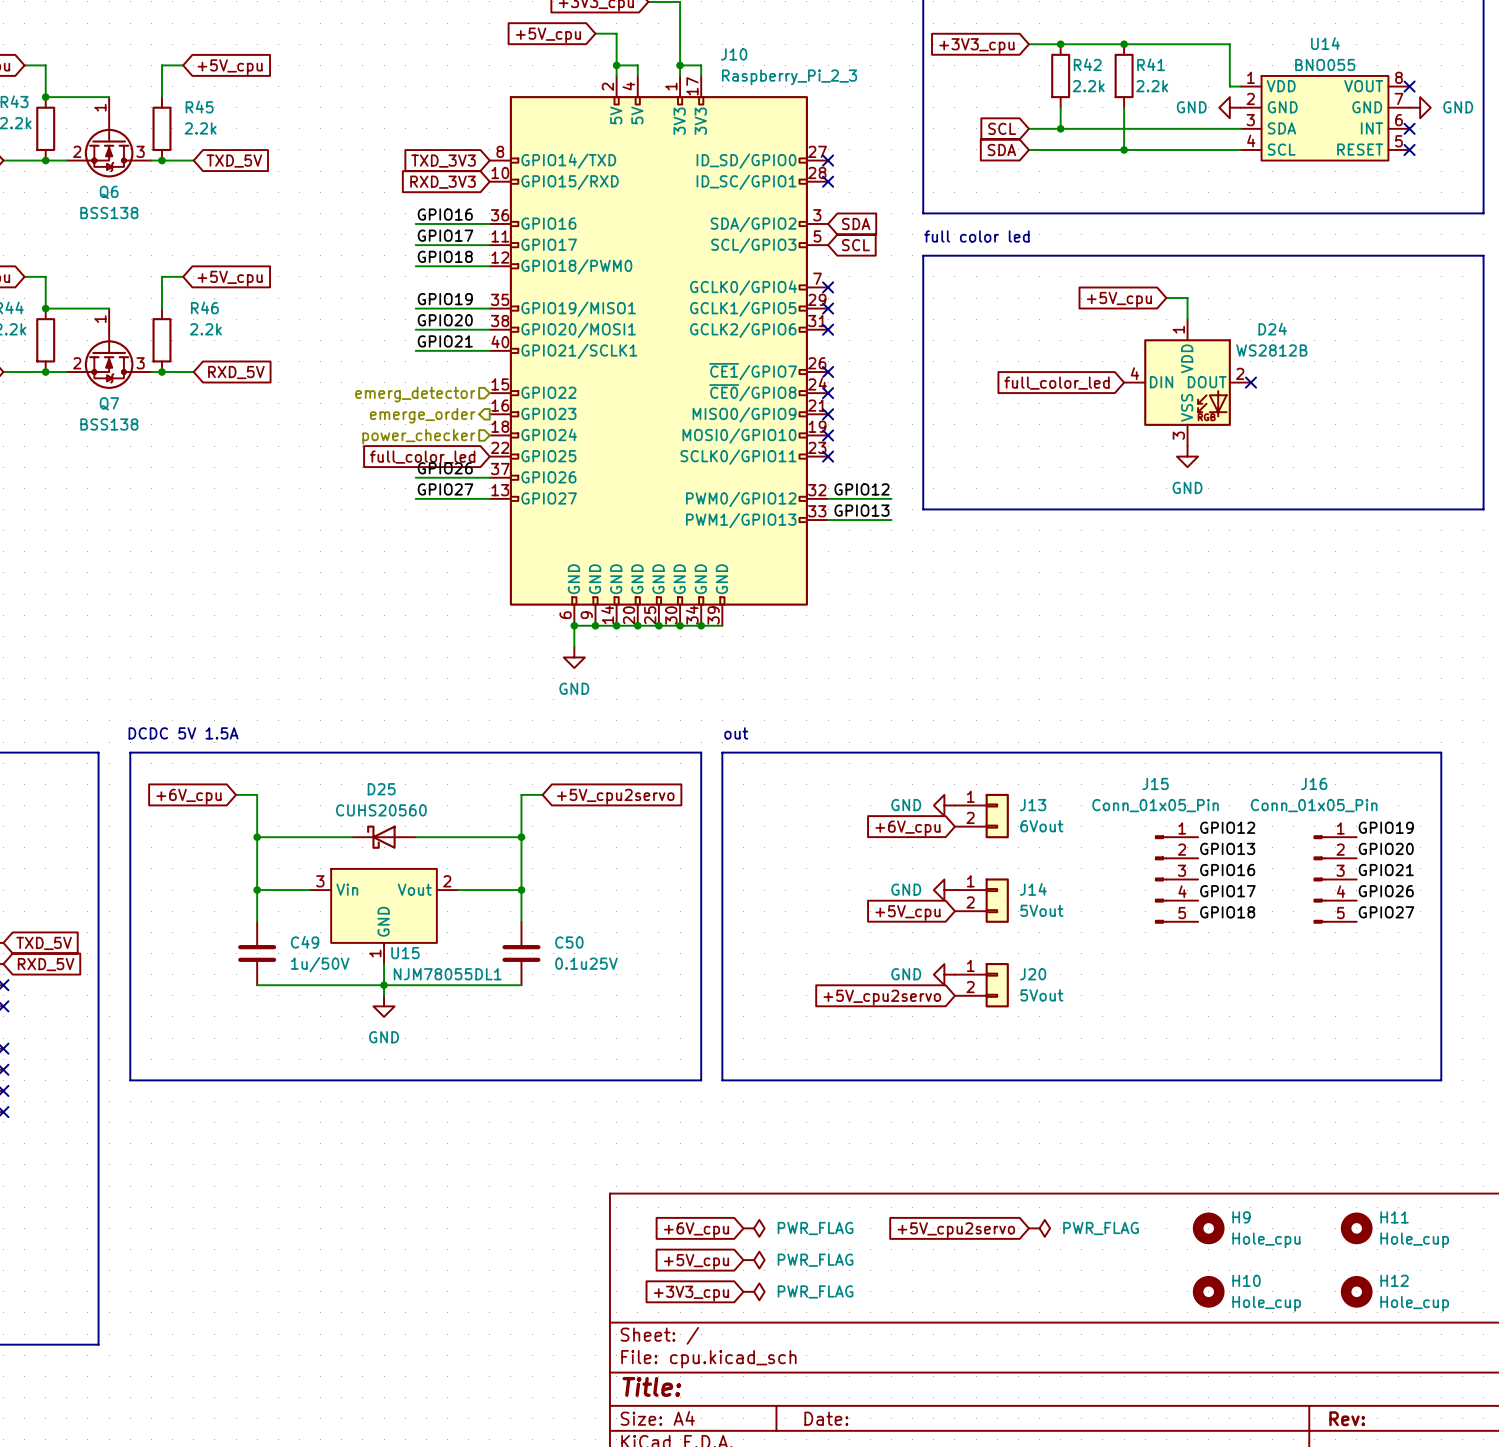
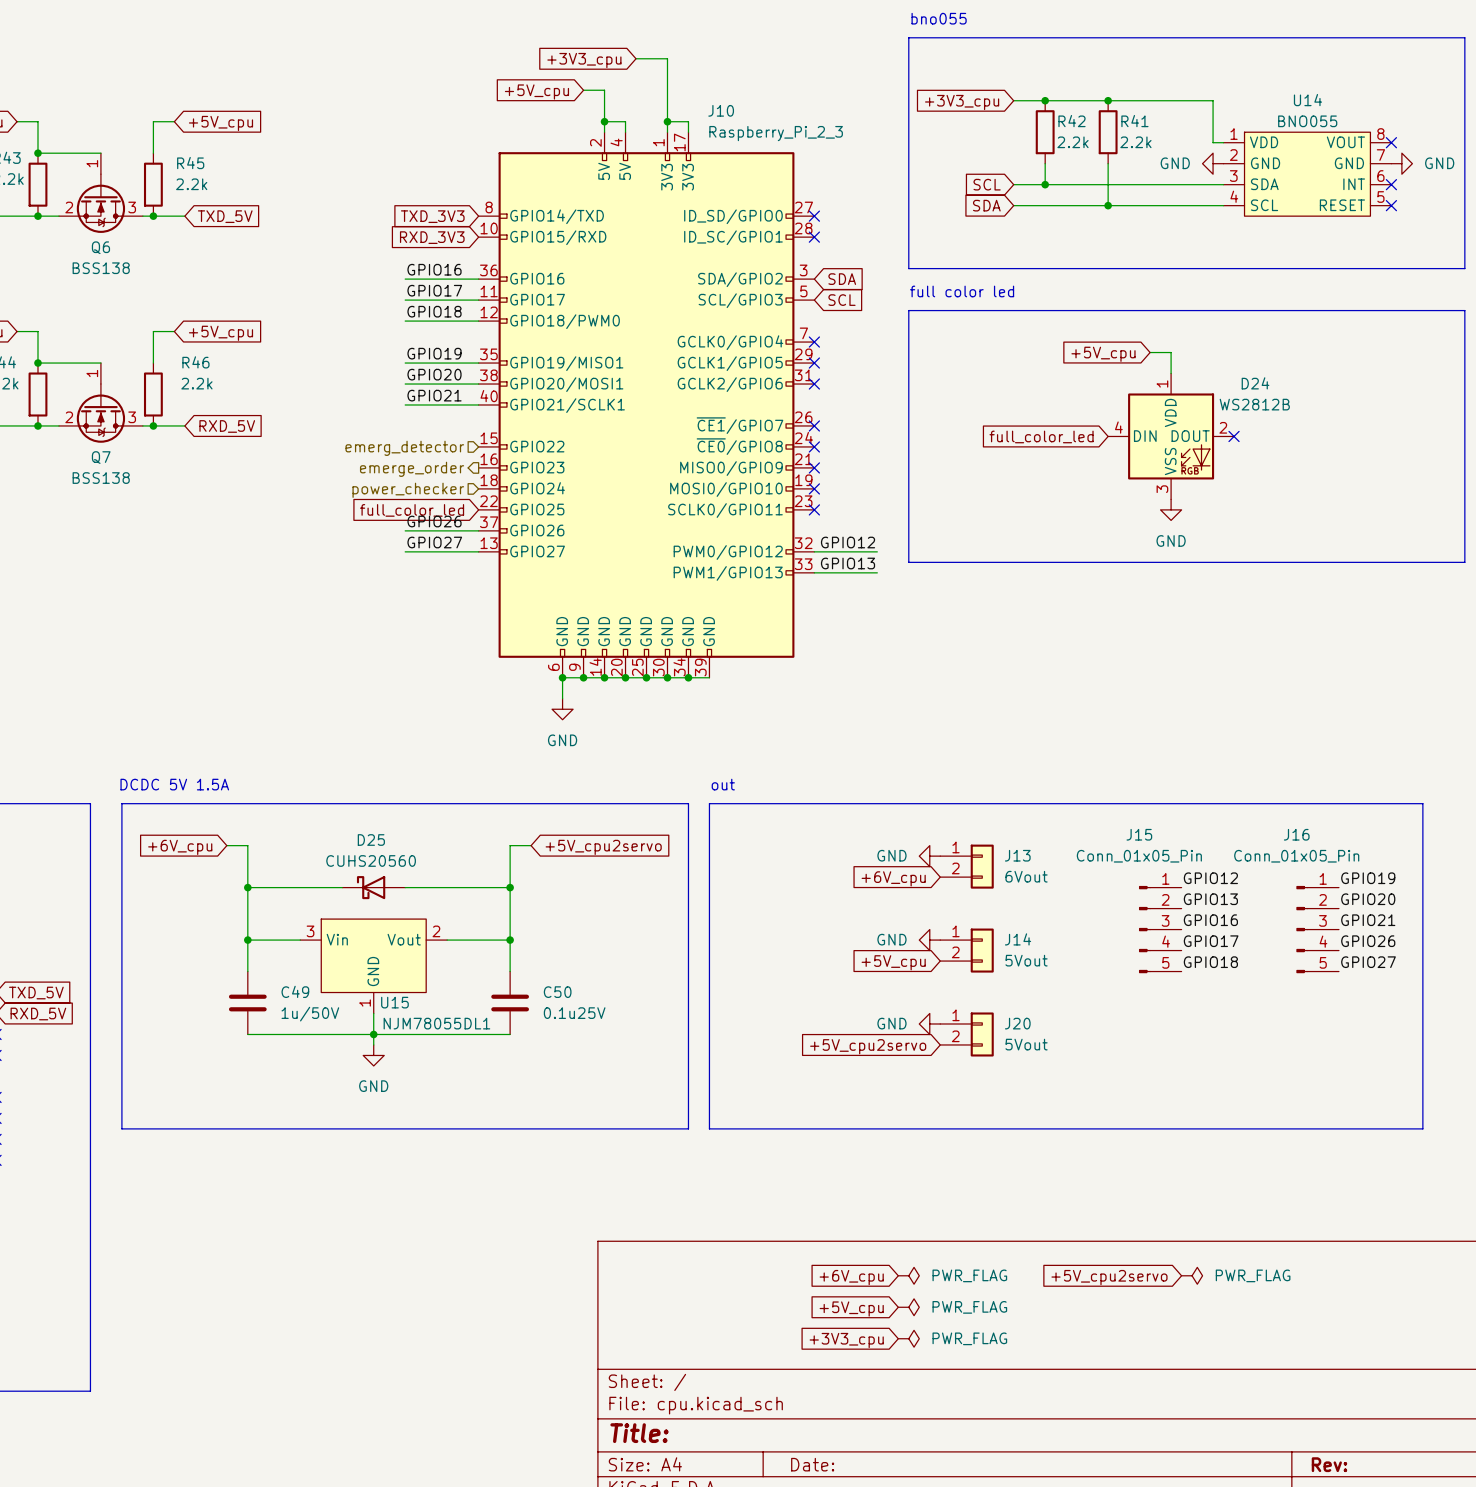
power symbol: PWR_FLAG (754, 1228) -> none
power symbol: none -> PWR_FLAG (908, 1275)
power symbol: PWR_FLAG (1039, 1228) -> none
power symbol: none -> PWR_FLAG (1192, 1275)
H9: Hole_cpu (1208, 1228) -> none
H11: Hole_cup (1356, 1228) -> none
global label position: +6V_cpu (696, 1230) -> +6V_cpu (851, 1277)
global label position: +5V_cpu2servo (956, 1230) -> +5V_cpu2servo (1109, 1277)
power symbol: PWR_FLAG (754, 1260) -> none
power symbol: none -> PWR_FLAG (908, 1307)
global label position: +5V_cpu (696, 1261) -> +5V_cpu (851, 1309)
power symbol: PWR_FLAG (754, 1291) -> none
power symbol: none -> PWR_FLAG (908, 1338)
H10: Hole_cup (1208, 1291) -> none
H12: Hole_cup (1356, 1291) -> none
global label position: +3V3_cpu (691, 1293) -> +3V3_cpu (846, 1340)

